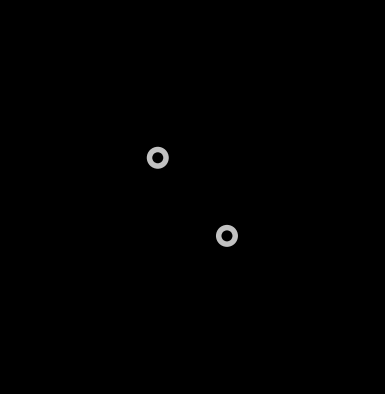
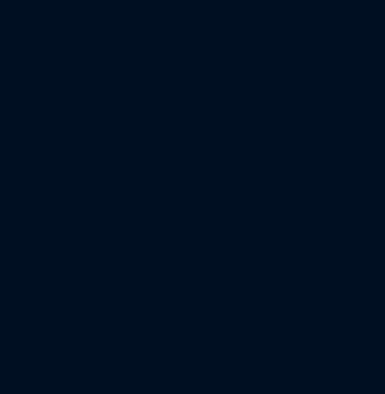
via: (157, 157) -> none
via: (226, 235) -> none

